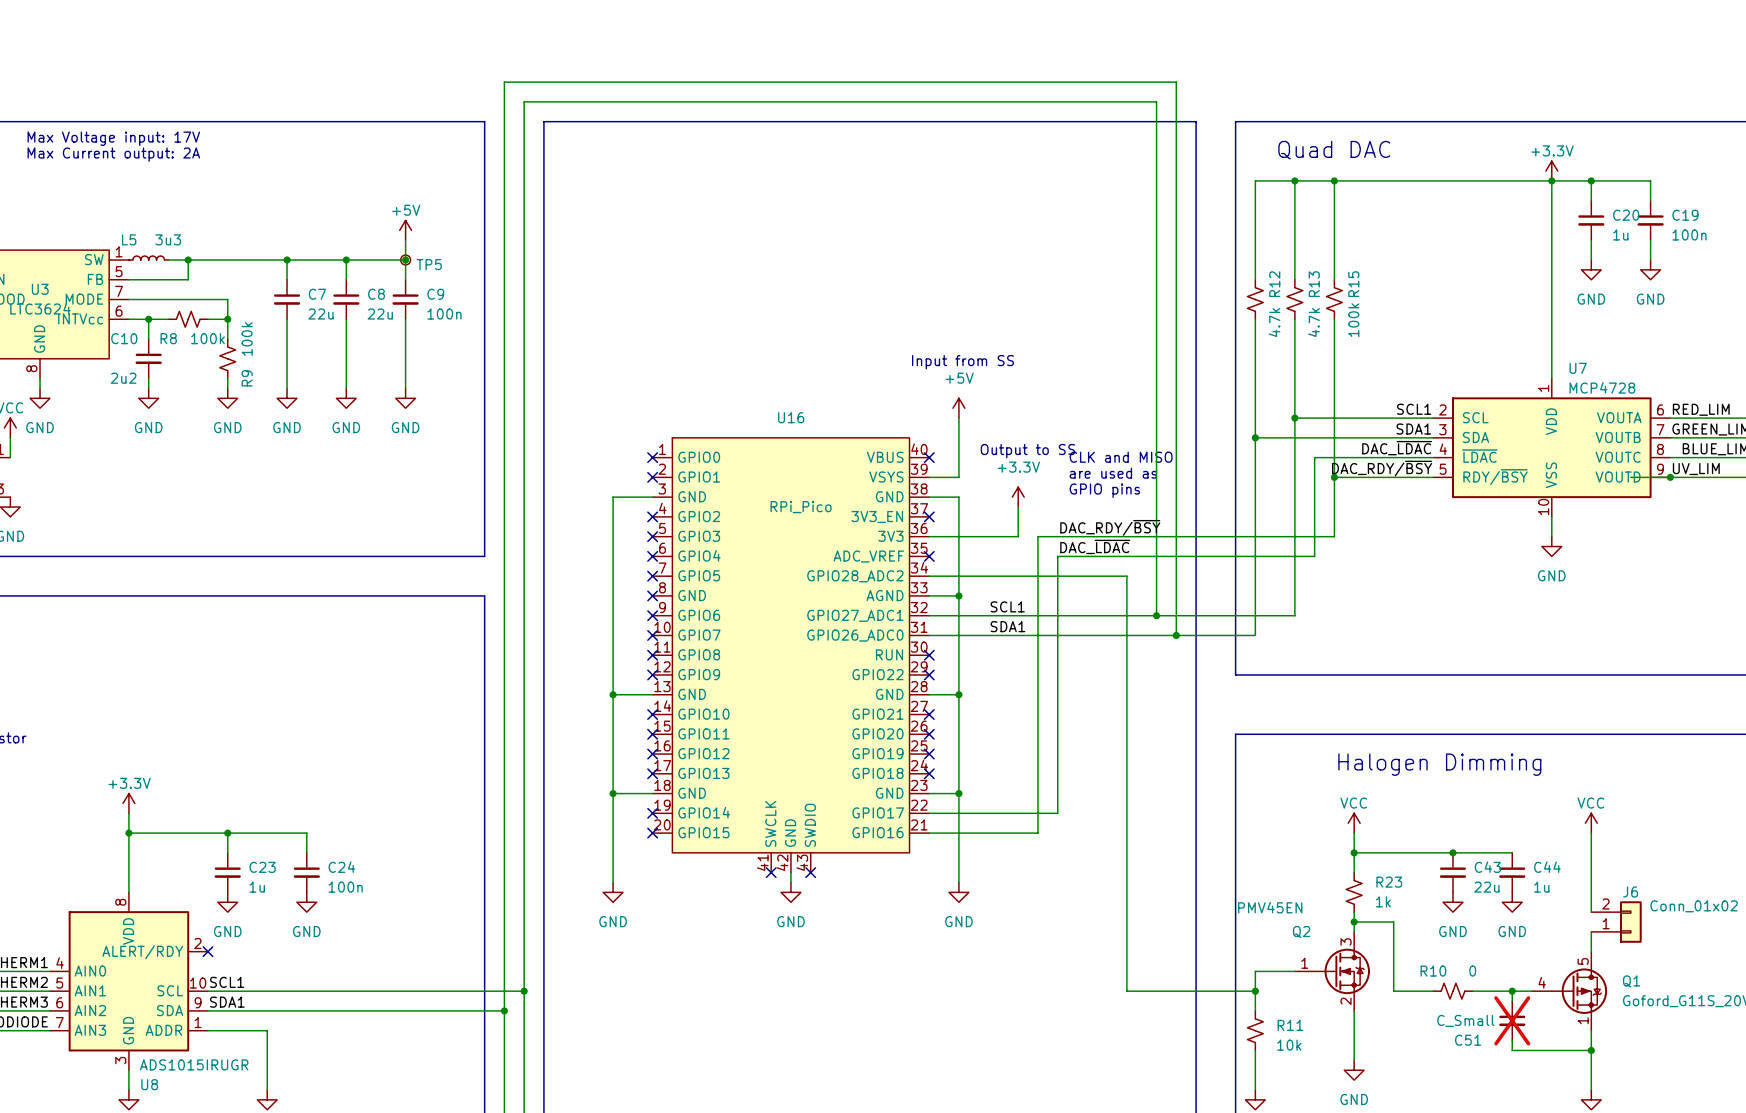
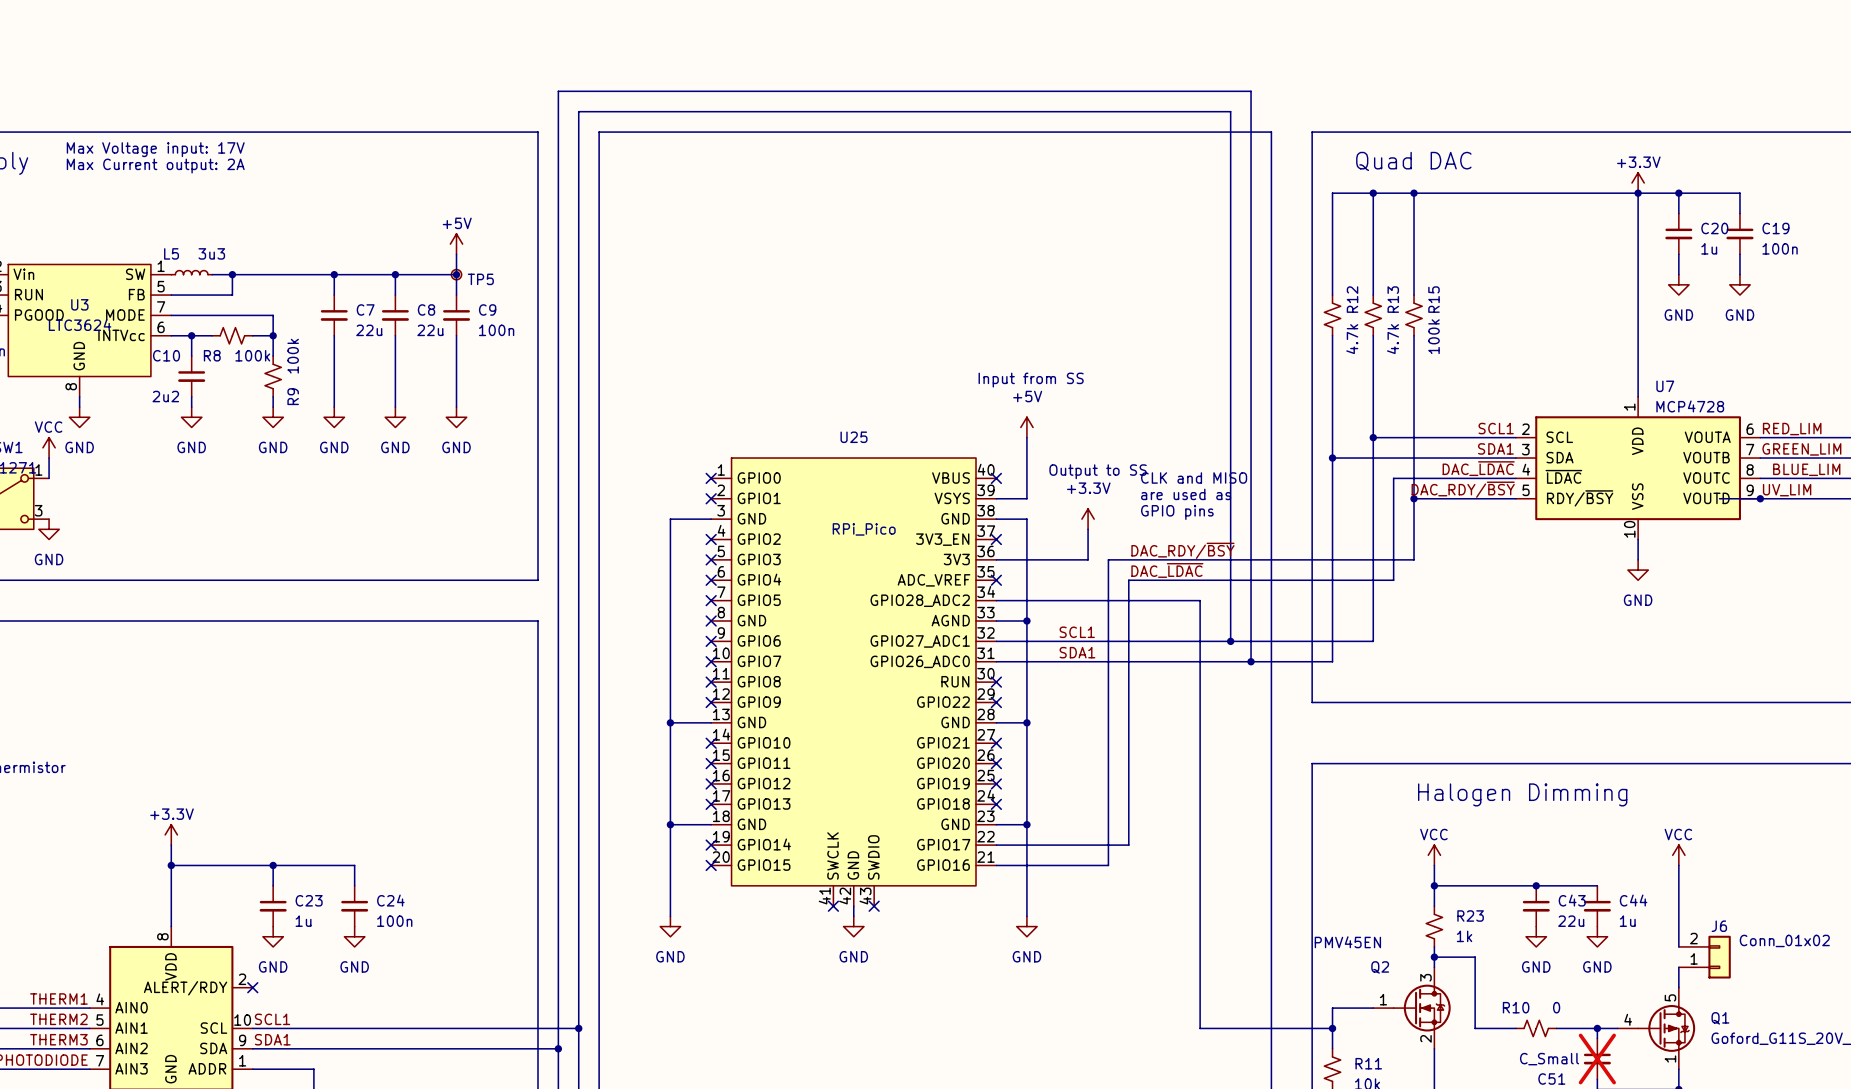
U16 name: U16 (791, 417) -> U25 (854, 437)

